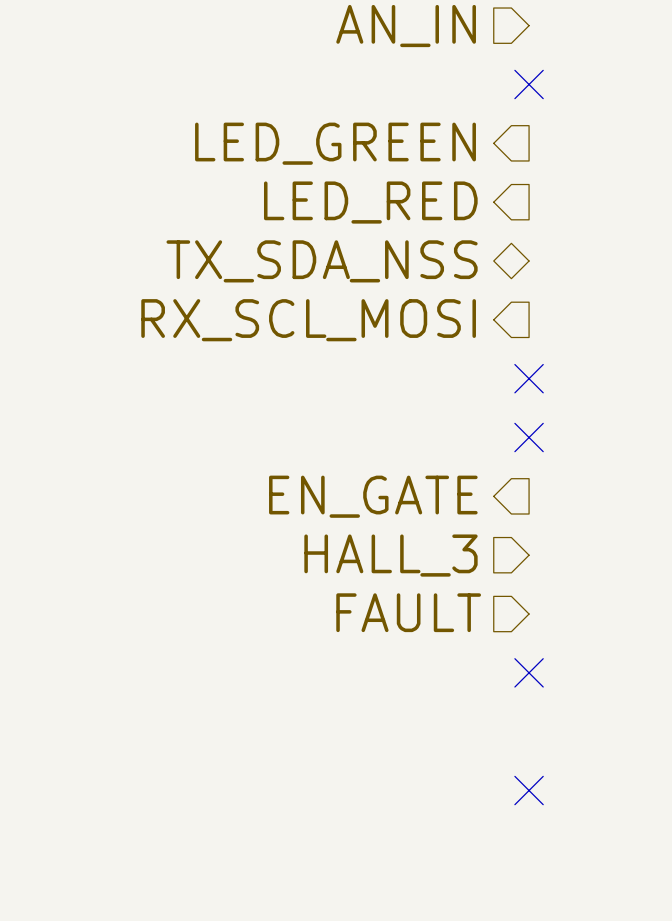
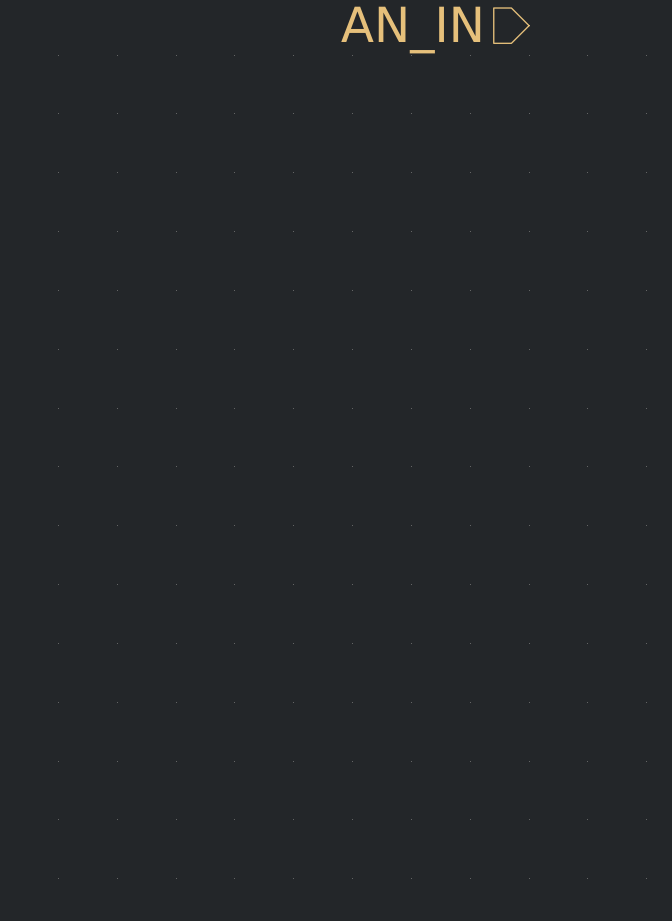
no-connect mark: (529, 84) -> none
hierarchical label: LED_GREEN (335, 143) -> none
hierarchical label: LED_RED (370, 202) -> none
hierarchical label: TX_SDA_NSS (322, 261) -> none
hierarchical label: RX_SCL_MOSI (308, 320) -> none
no-connect mark: (529, 378) -> none
no-connect mark: (529, 437) -> none
hierarchical label: EN_GATE (373, 496) -> none
hierarchical label: HALL_3 (390, 555) -> none
hierarchical label: FAULT (408, 612) -> none
no-connect mark: (529, 672) -> none
no-connect mark: (529, 790) -> none

